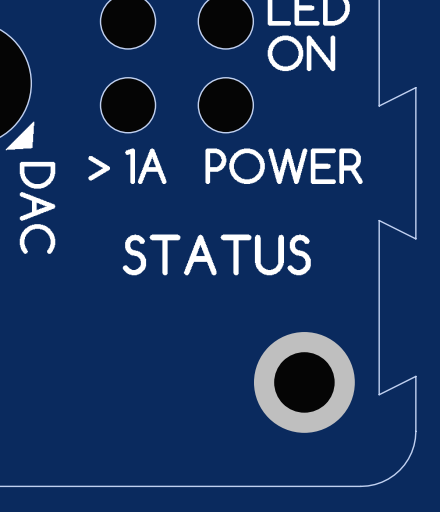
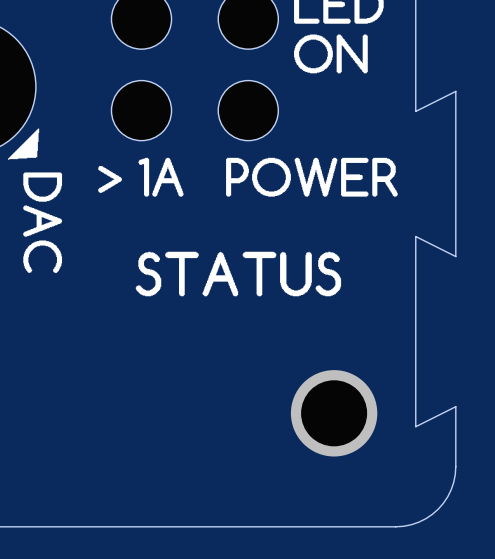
via size: [253, 332, 355, 433] -> [290, 370, 378, 457]

